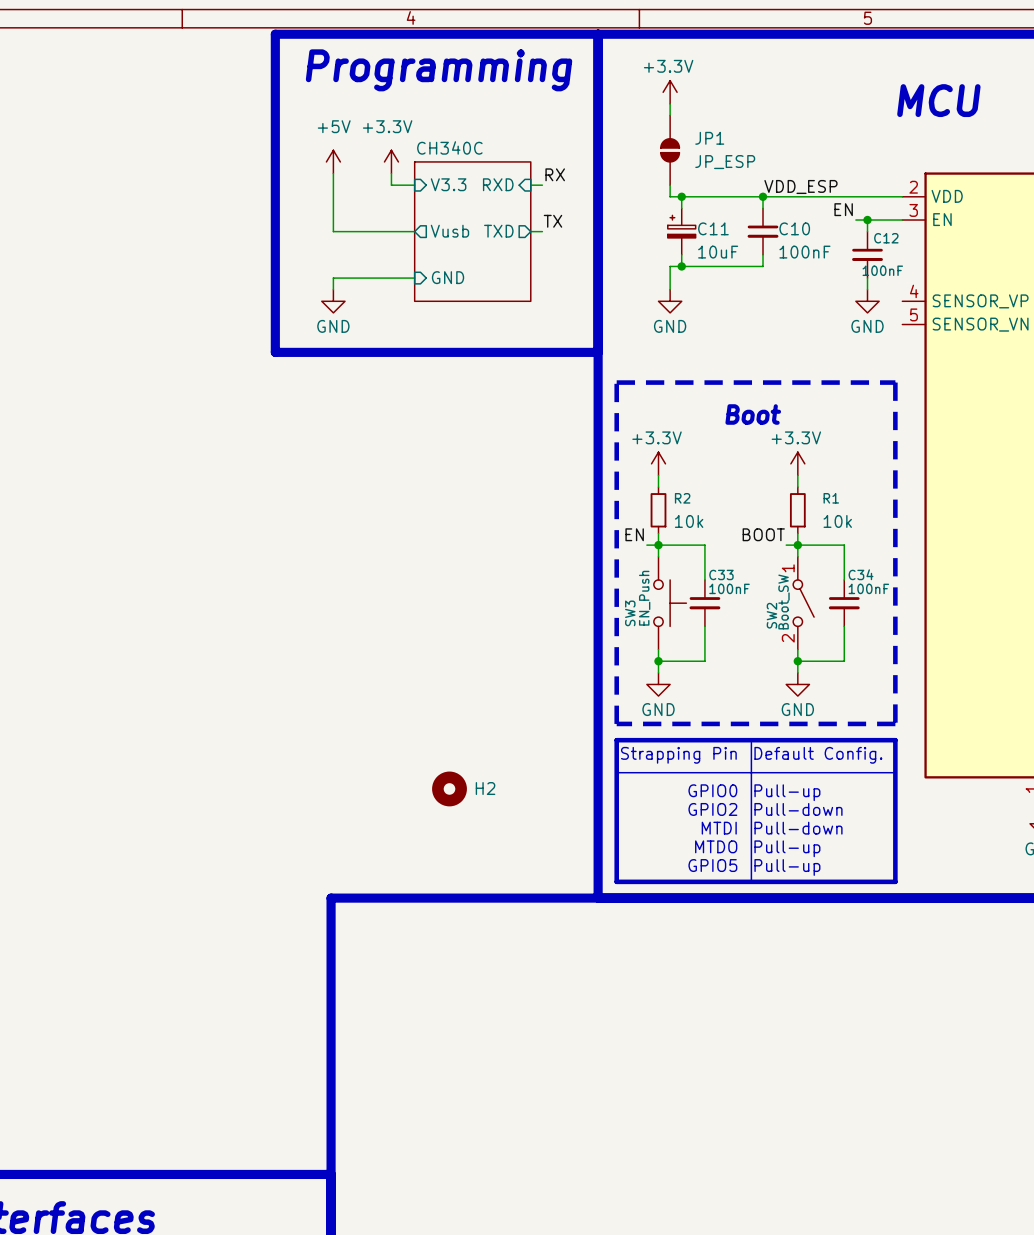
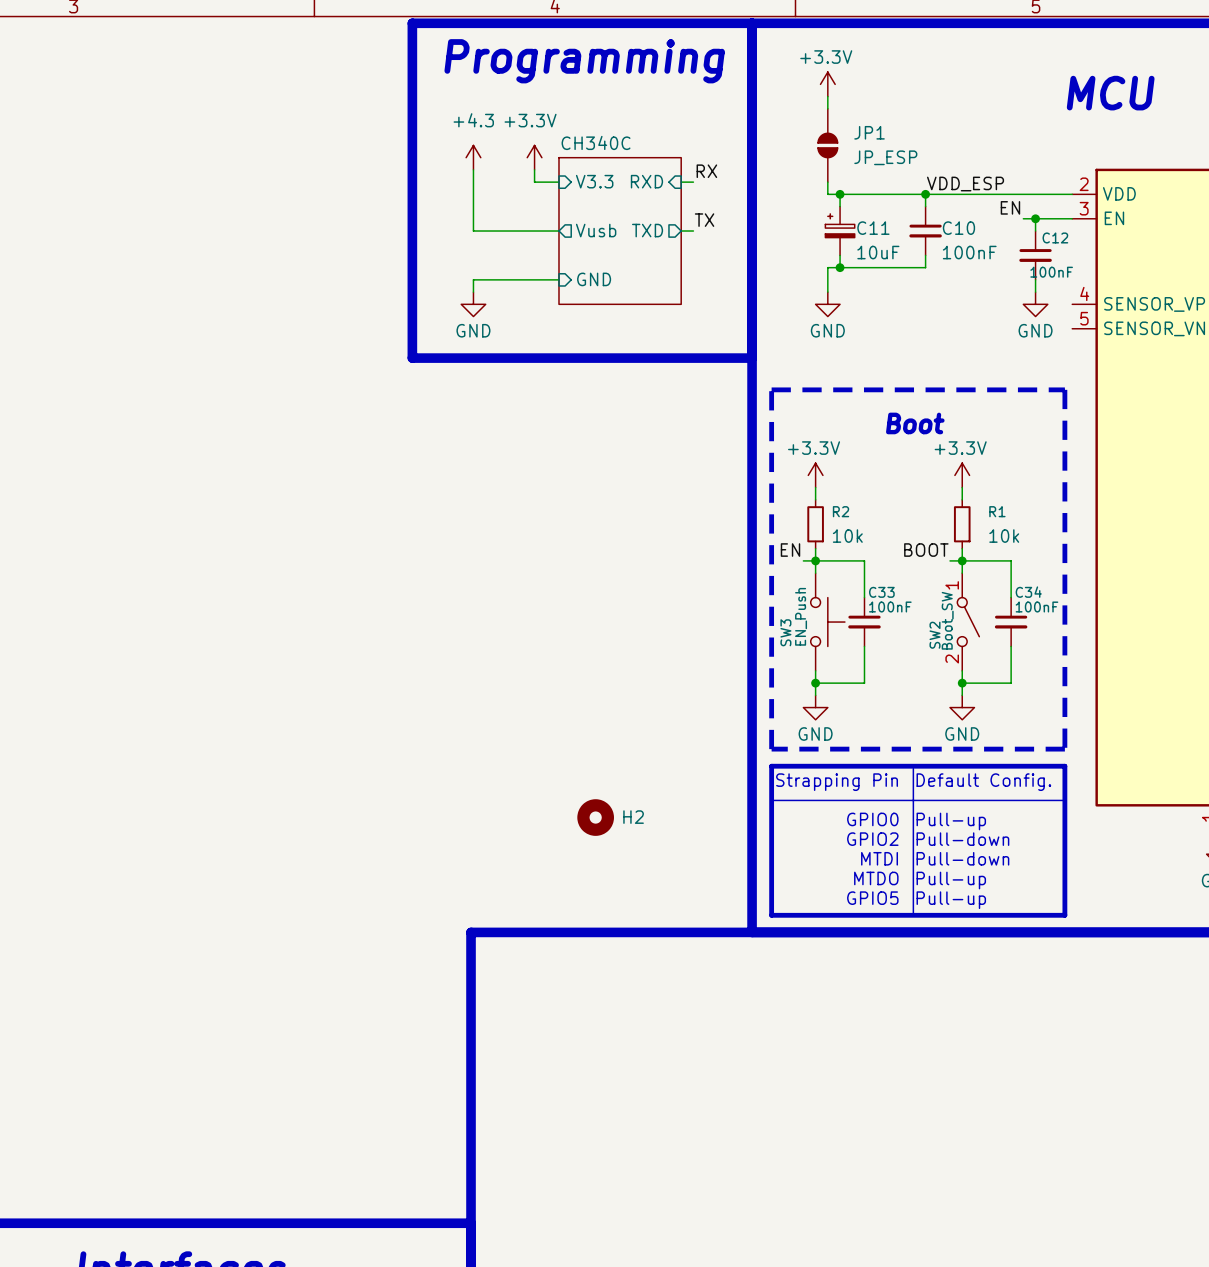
power symbol: +5V (333, 161) -> +4.3 (473, 157)

